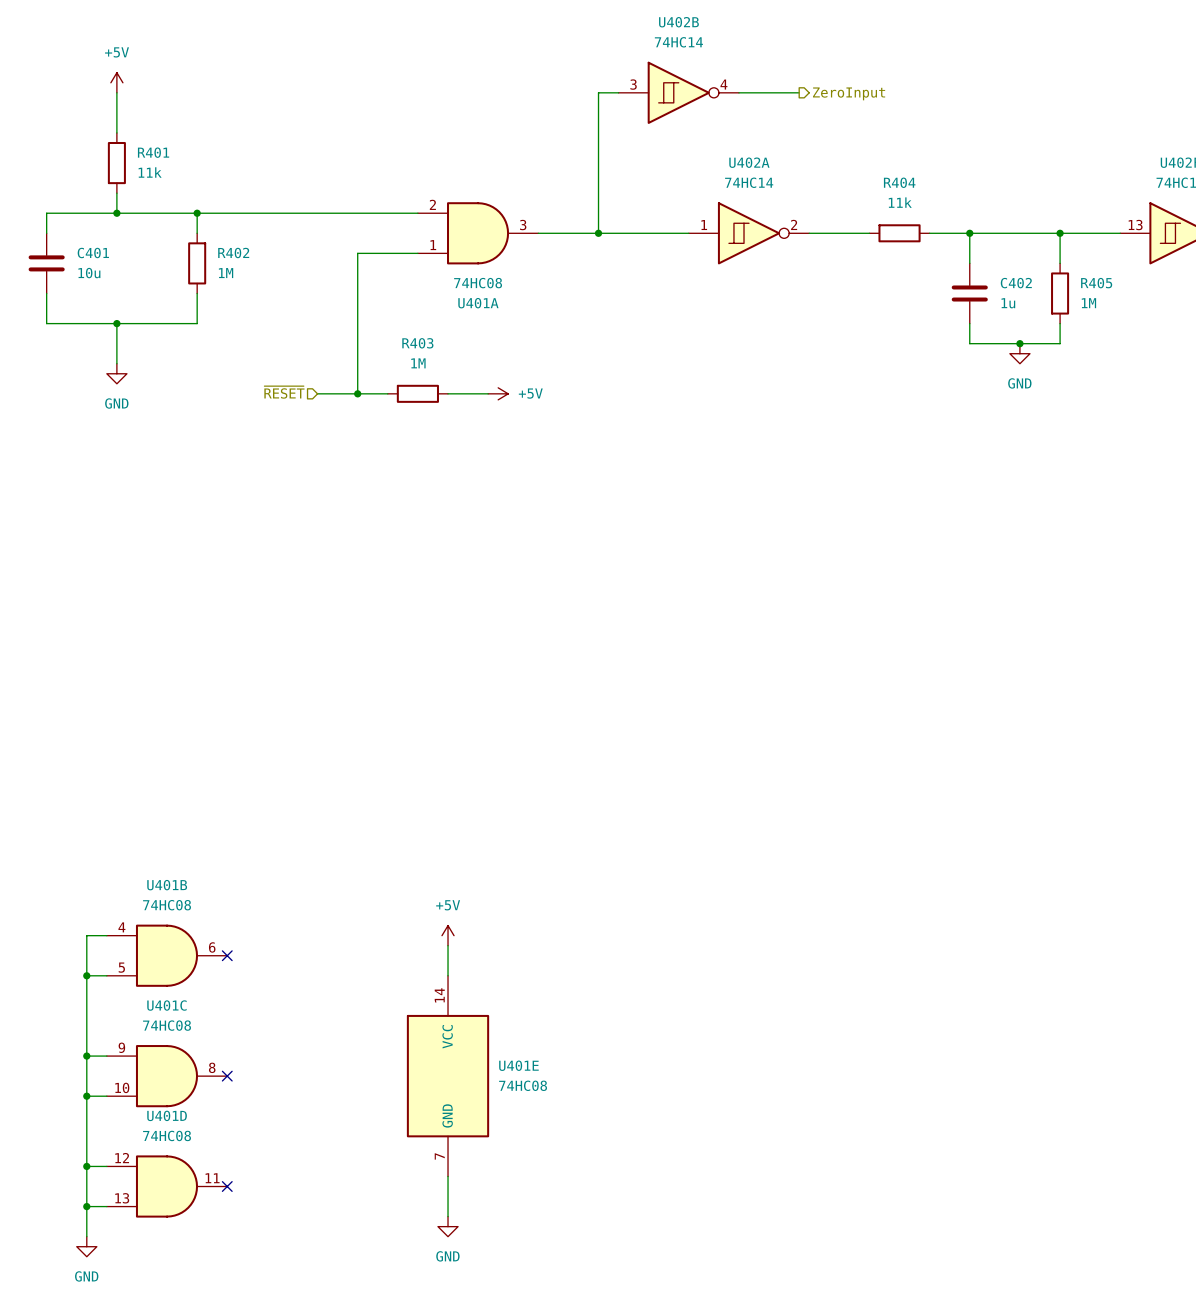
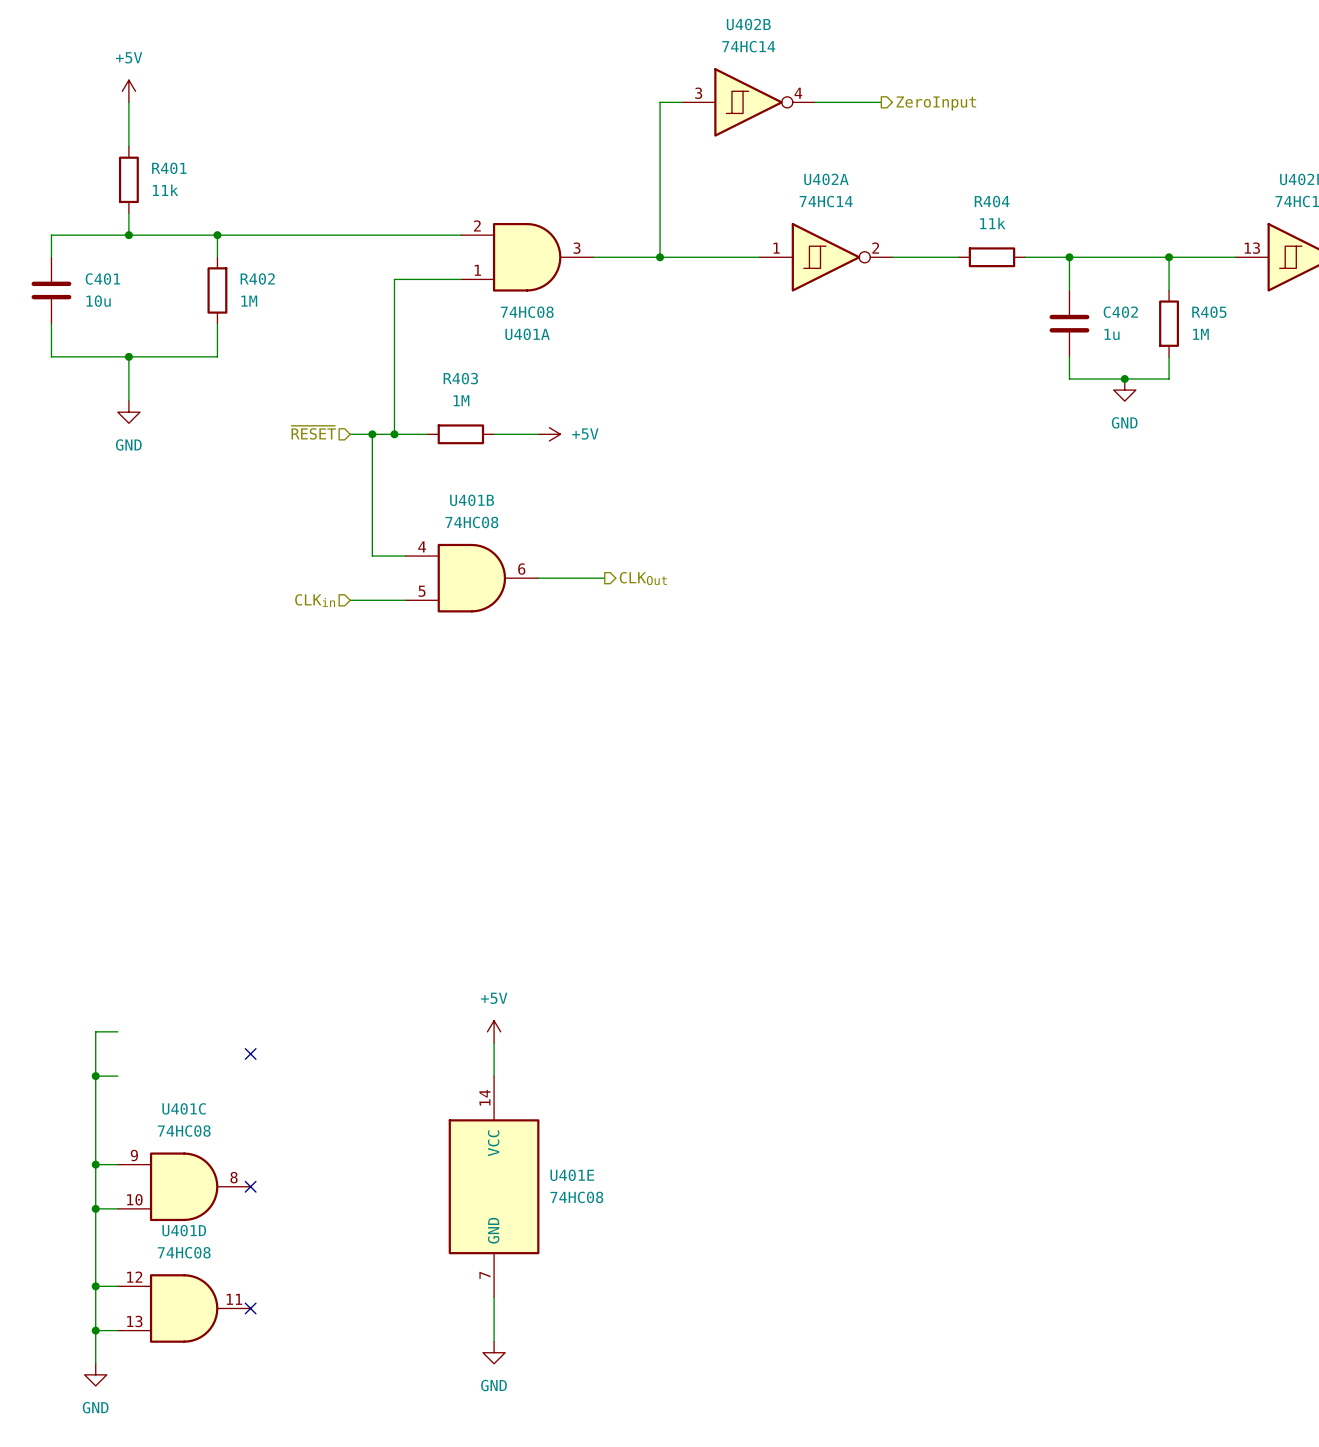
wire: none -> (372, 434) (372, 556) (405, 556)
junction: none -> (372, 434)
wire: none -> (538, 578) (604, 578)
hierarchical label: none -> CLKOut (643, 578)
hierarchical label: none -> CLKin (315, 600)
wire: none -> (350, 600) (405, 600)
U401B position: (167, 955) -> (471, 578)

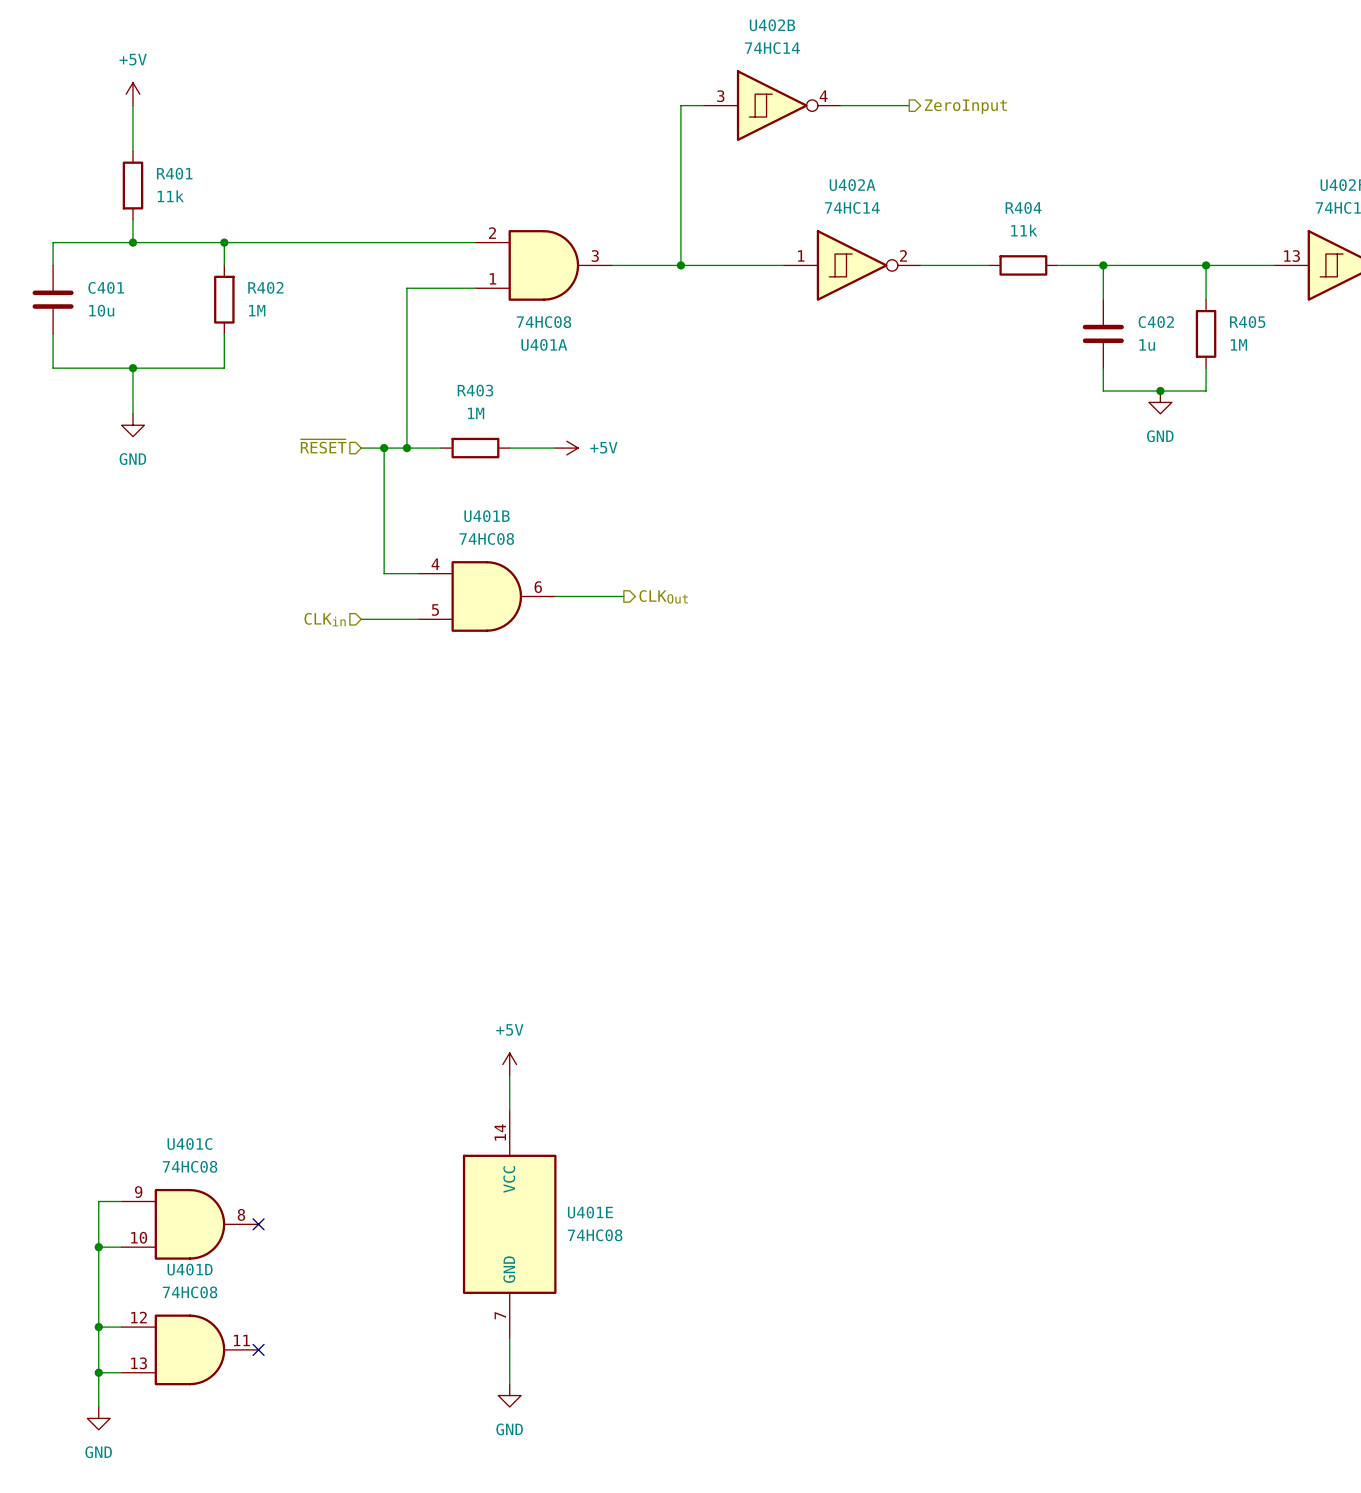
wire: (117, 1031) (95, 1031) (95, 1164) -> none
no-connect mark: (250, 1053) -> none
wire: (95, 1076) (117, 1076) -> none
junction: (95, 1076) -> none
junction: (95, 1164) -> none

